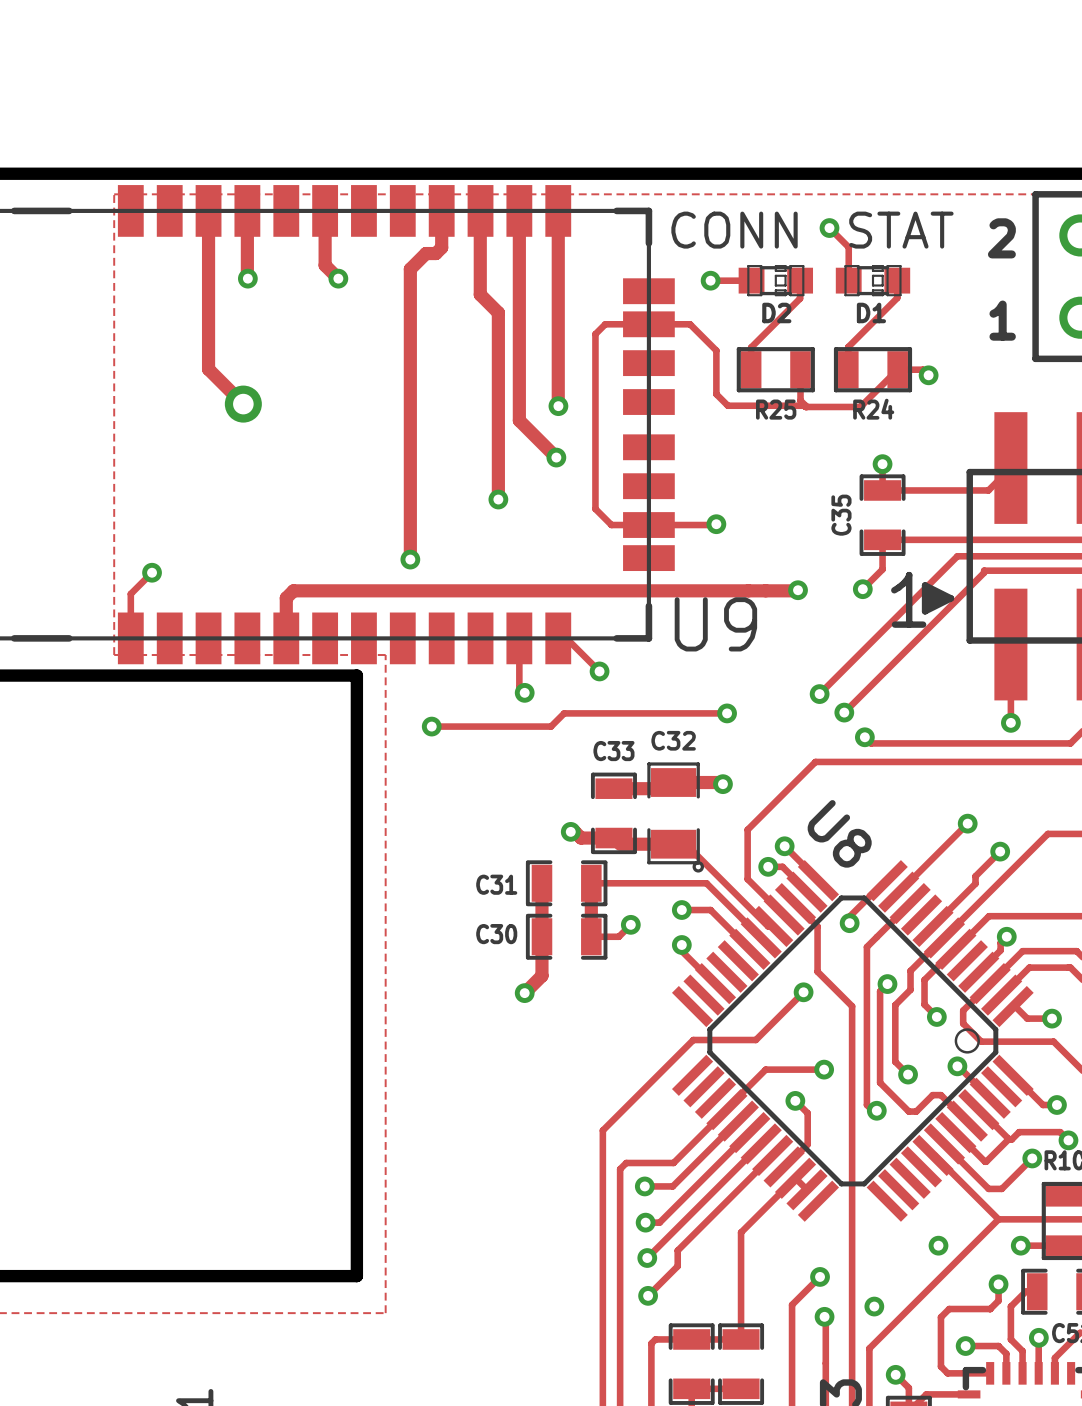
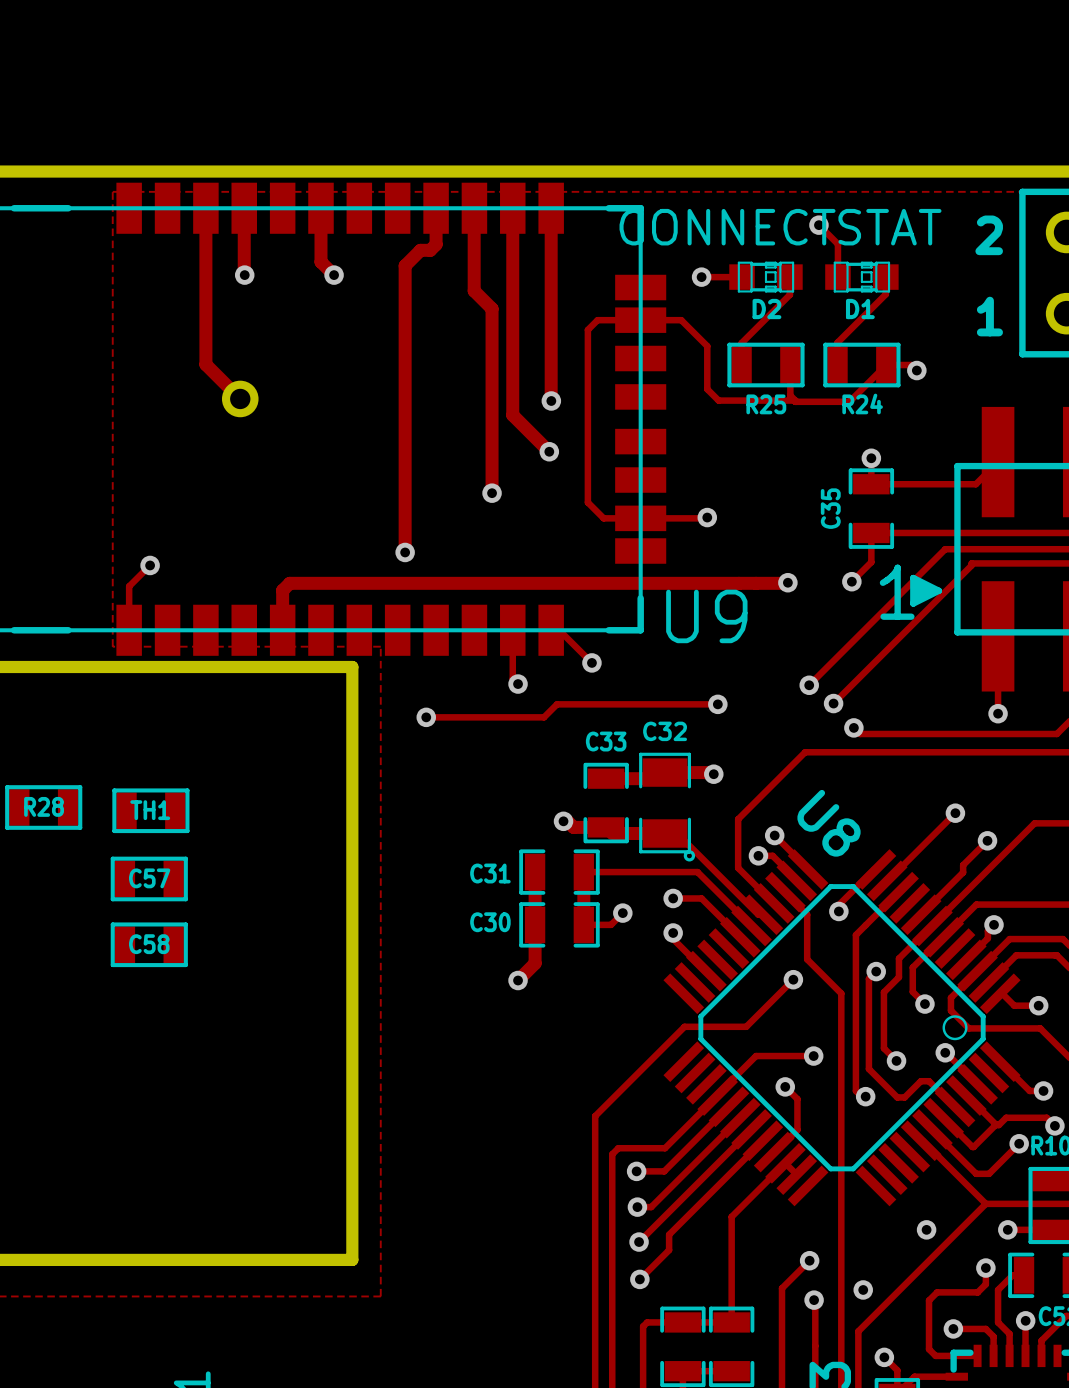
D2 value: CONN (734, 230) -> CONNECT (727, 227)
R28: none -> (43, 807)
TH1: none -> (150, 810)
C57: none -> (149, 878)
C58: none -> (149, 944)

